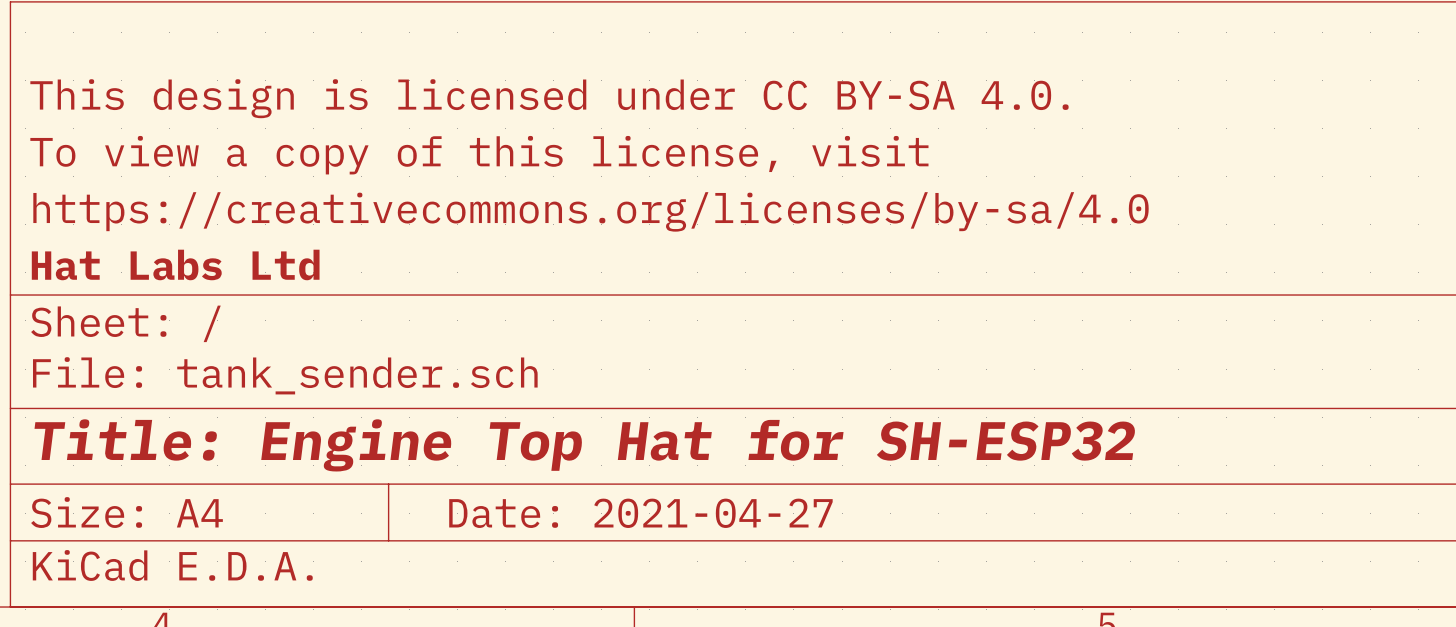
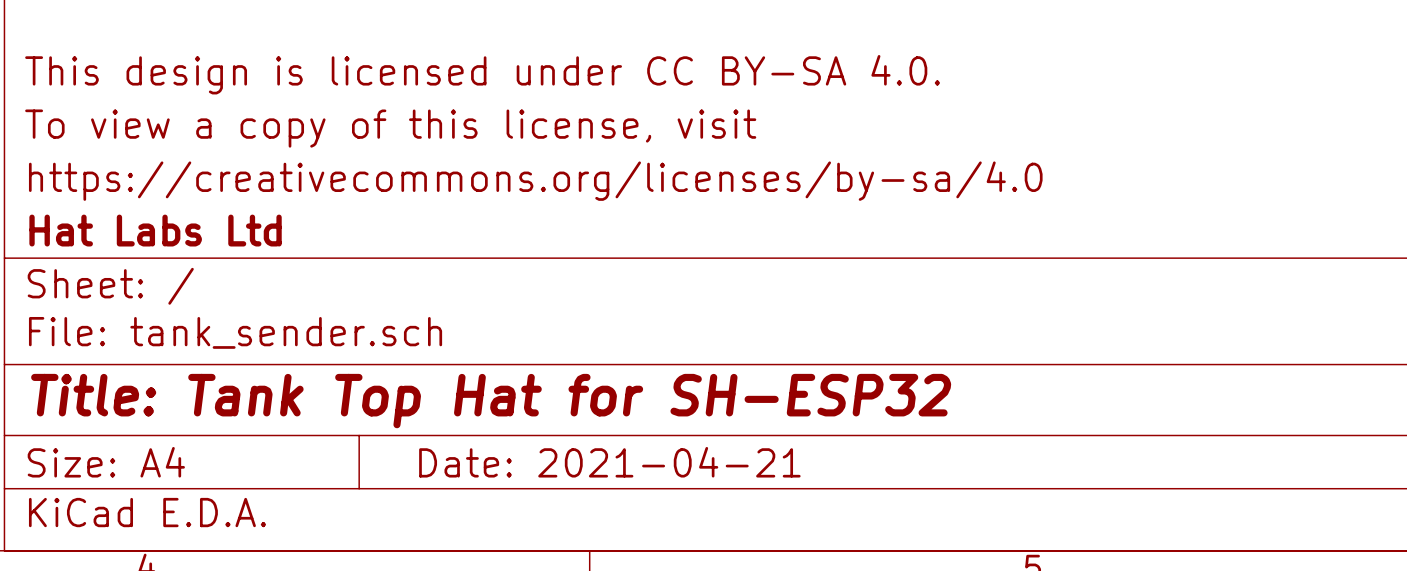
title block: Title: Engine Top Hat for SH-ESP32 (584, 445) -> Title: Tank Top Hat for SH-ESP32 (491, 401)
title block: Date: 2021-04-27 (640, 513) -> Date: 2021-04-21 (609, 462)

